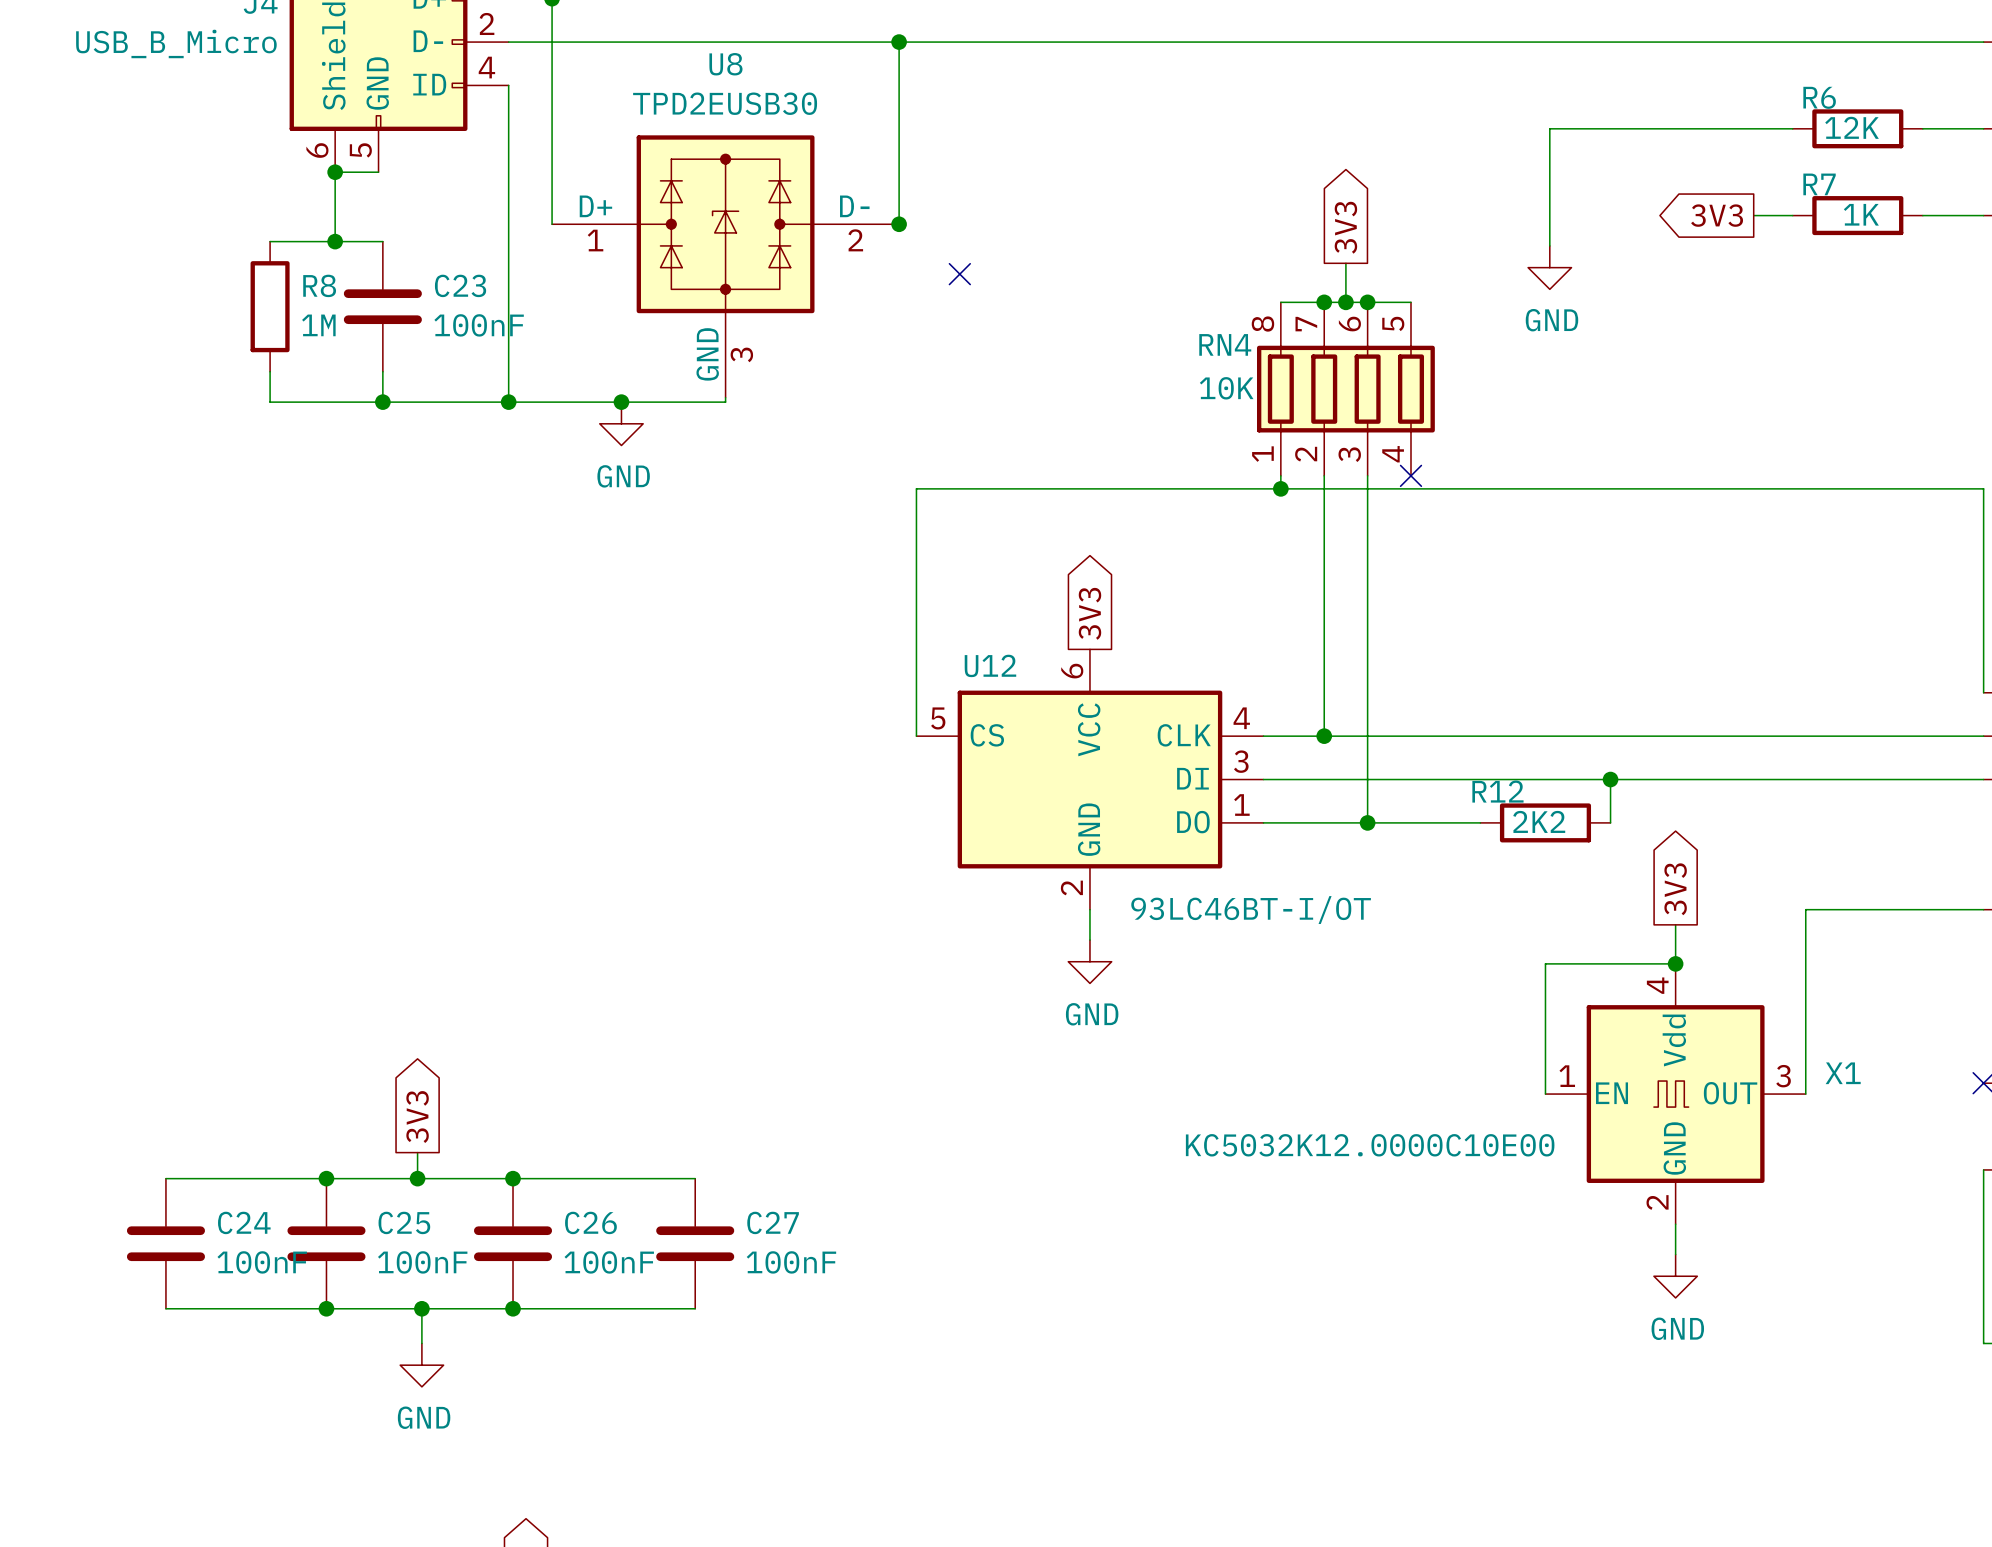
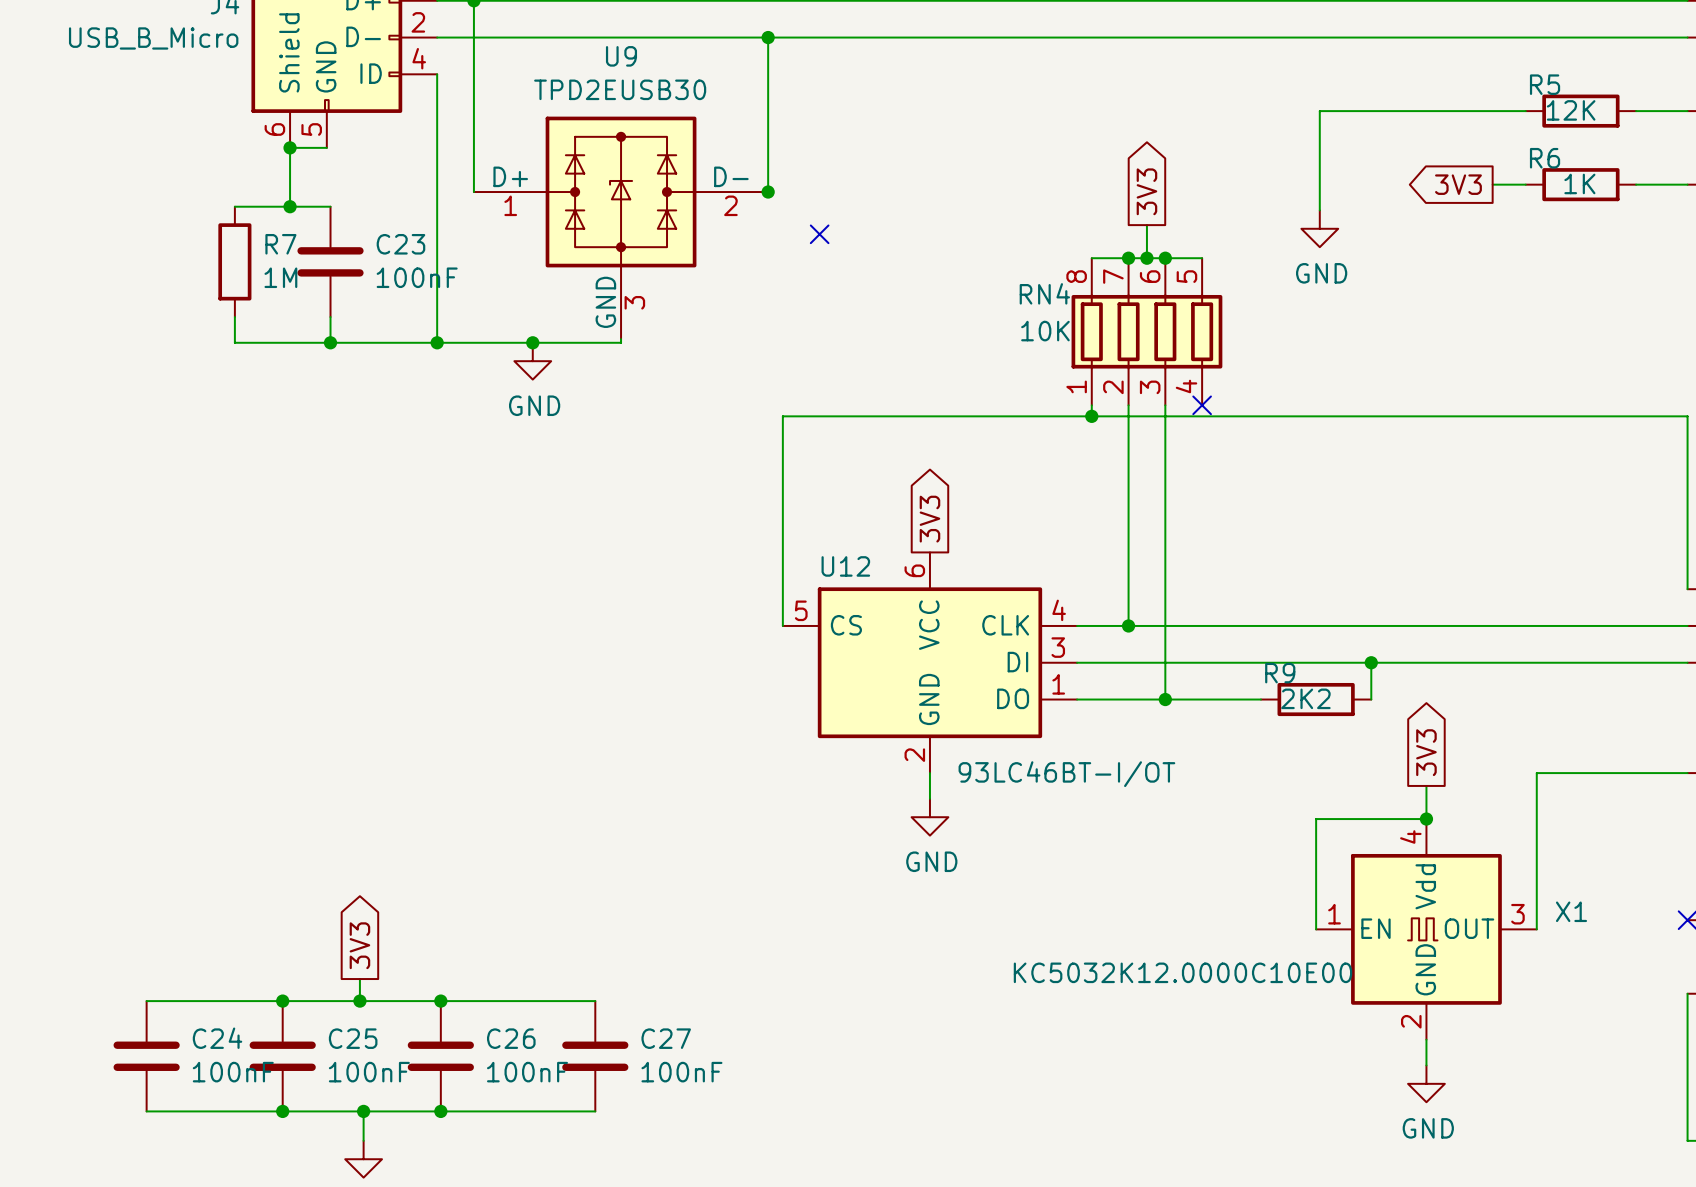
U8 name: U8 (725, 64) -> U9 (621, 56)
R6 name: R6 (1819, 97) -> R5 (1545, 84)
R7 name: R7 (1819, 184) -> R6 (1545, 158)
R8 name: R8 (319, 285) -> R7 (280, 244)
R12 name: R12 (1497, 791) -> R9 (1280, 673)

